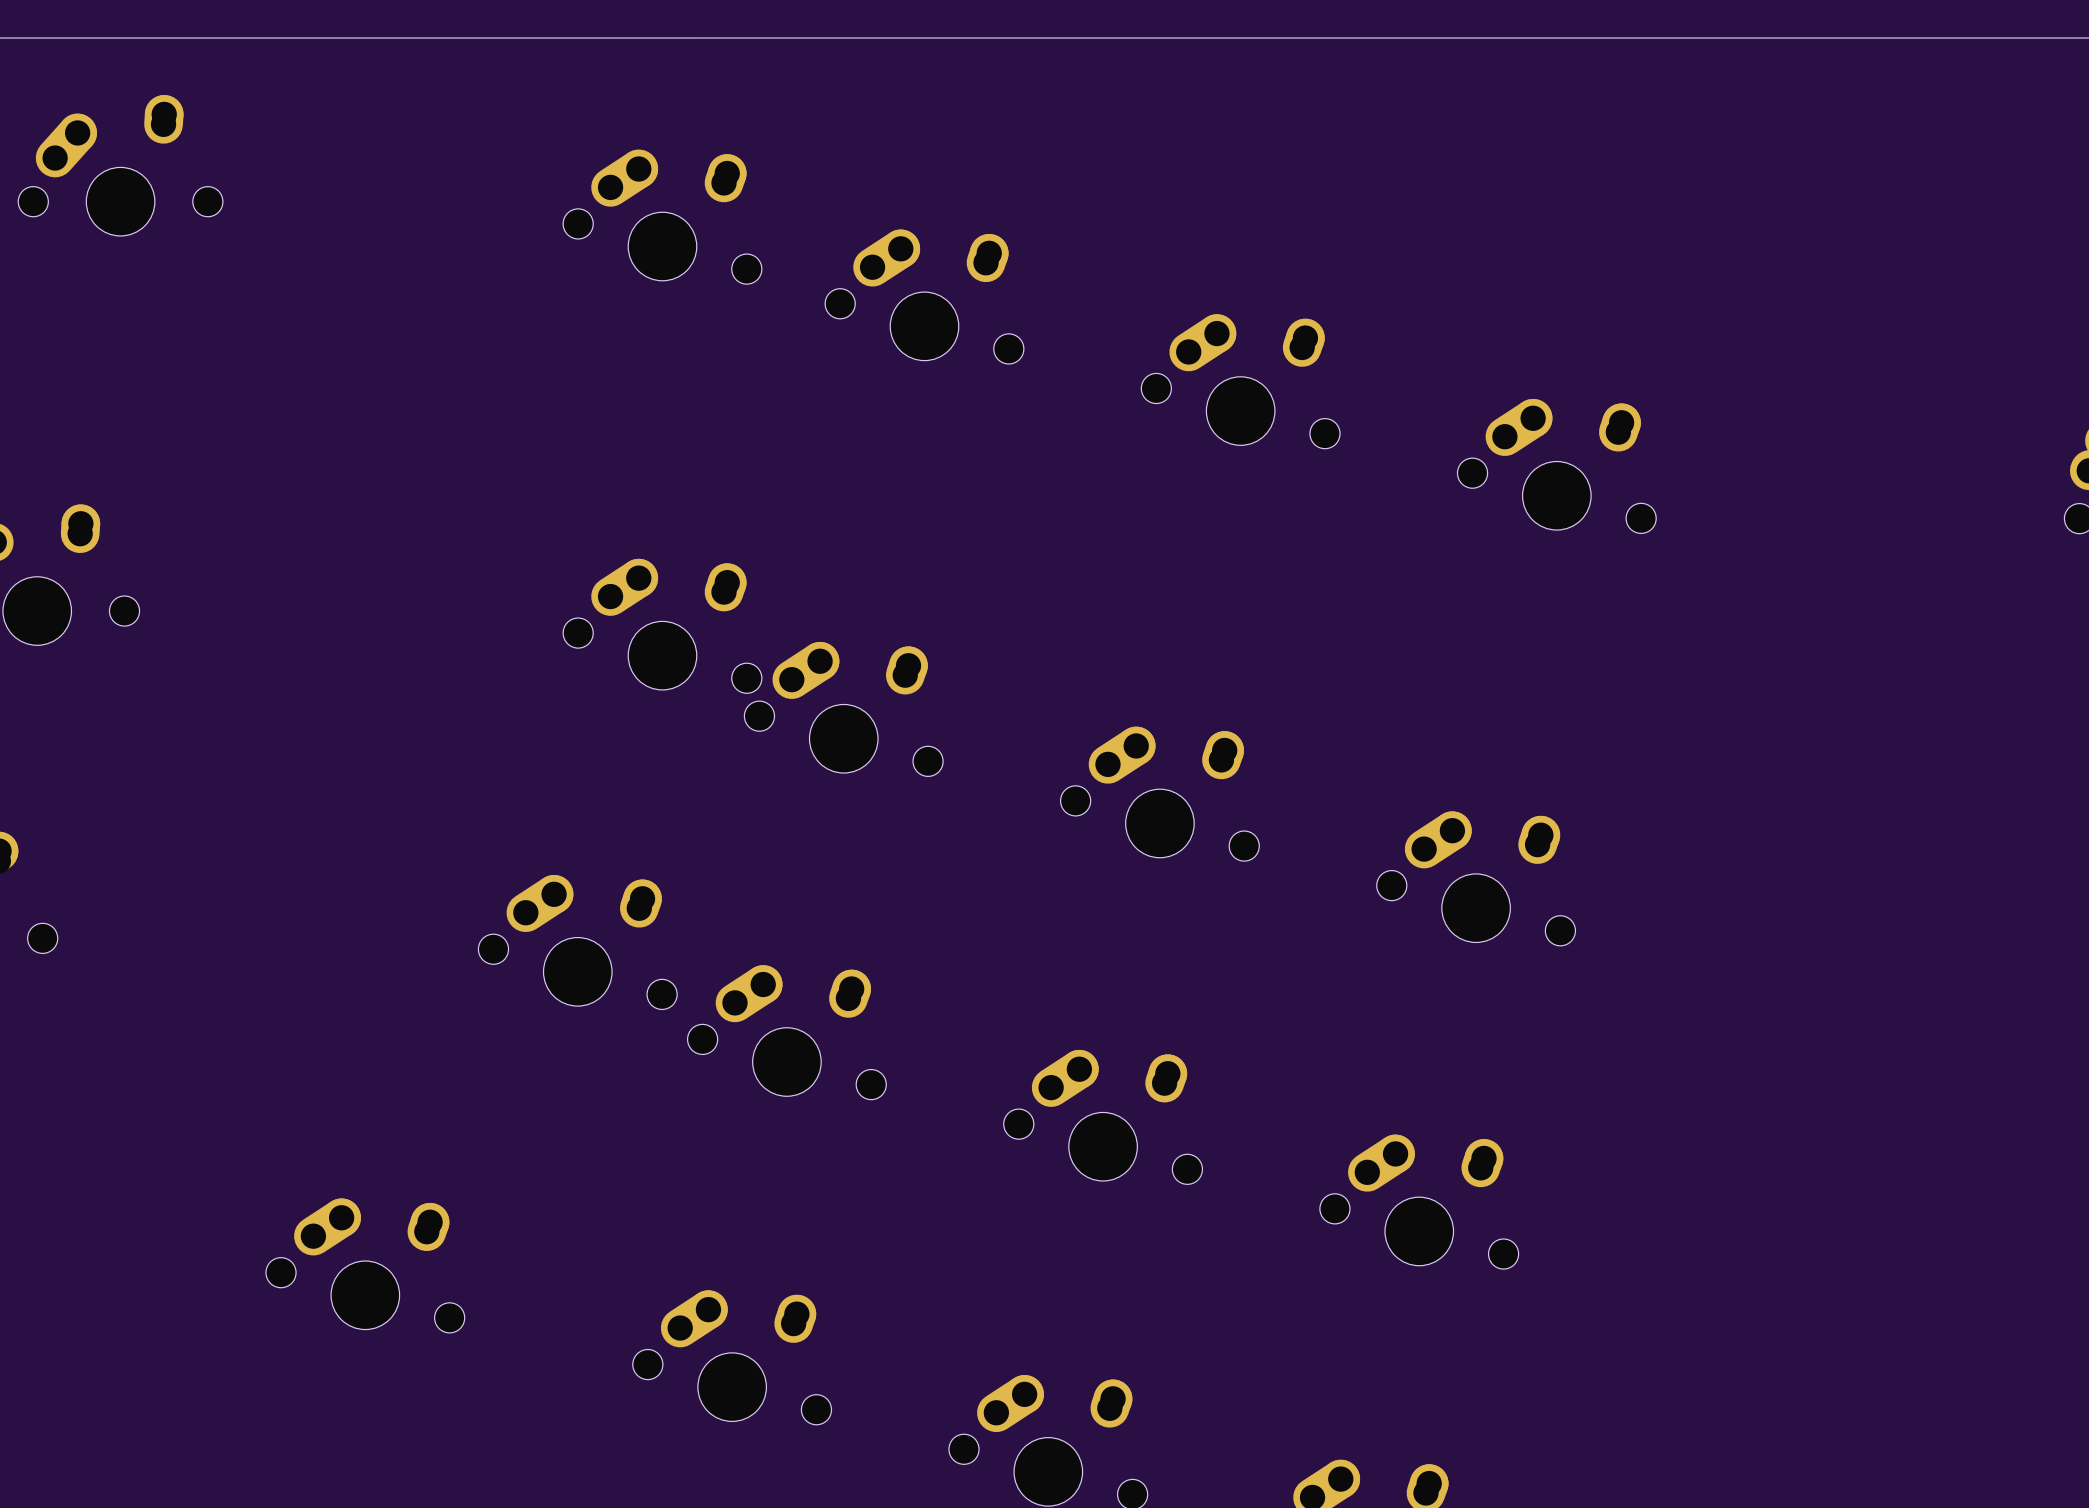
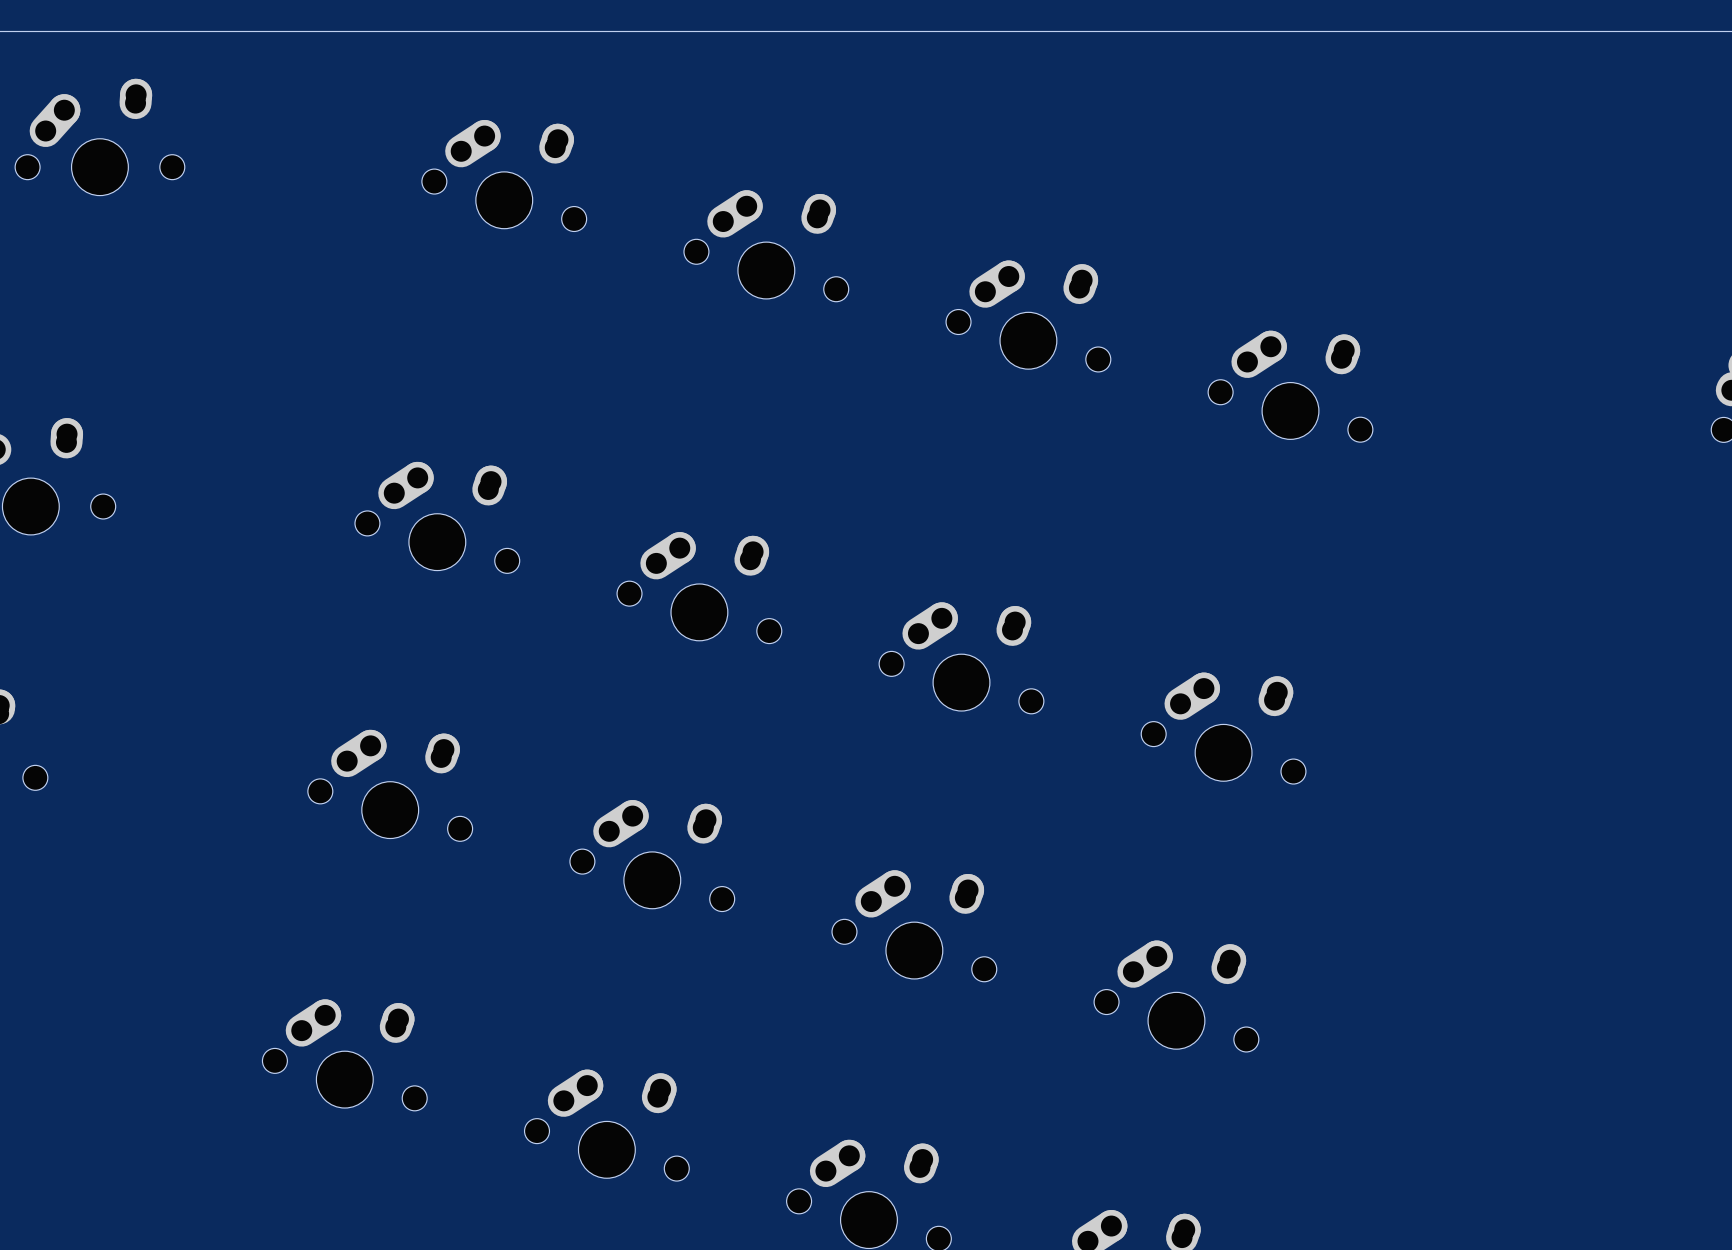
part position: (662, 216) -> (504, 175)
part position: (662, 626) -> (437, 517)
part position: (577, 942) -> (390, 785)
part position: (365, 1265) -> (344, 1055)

